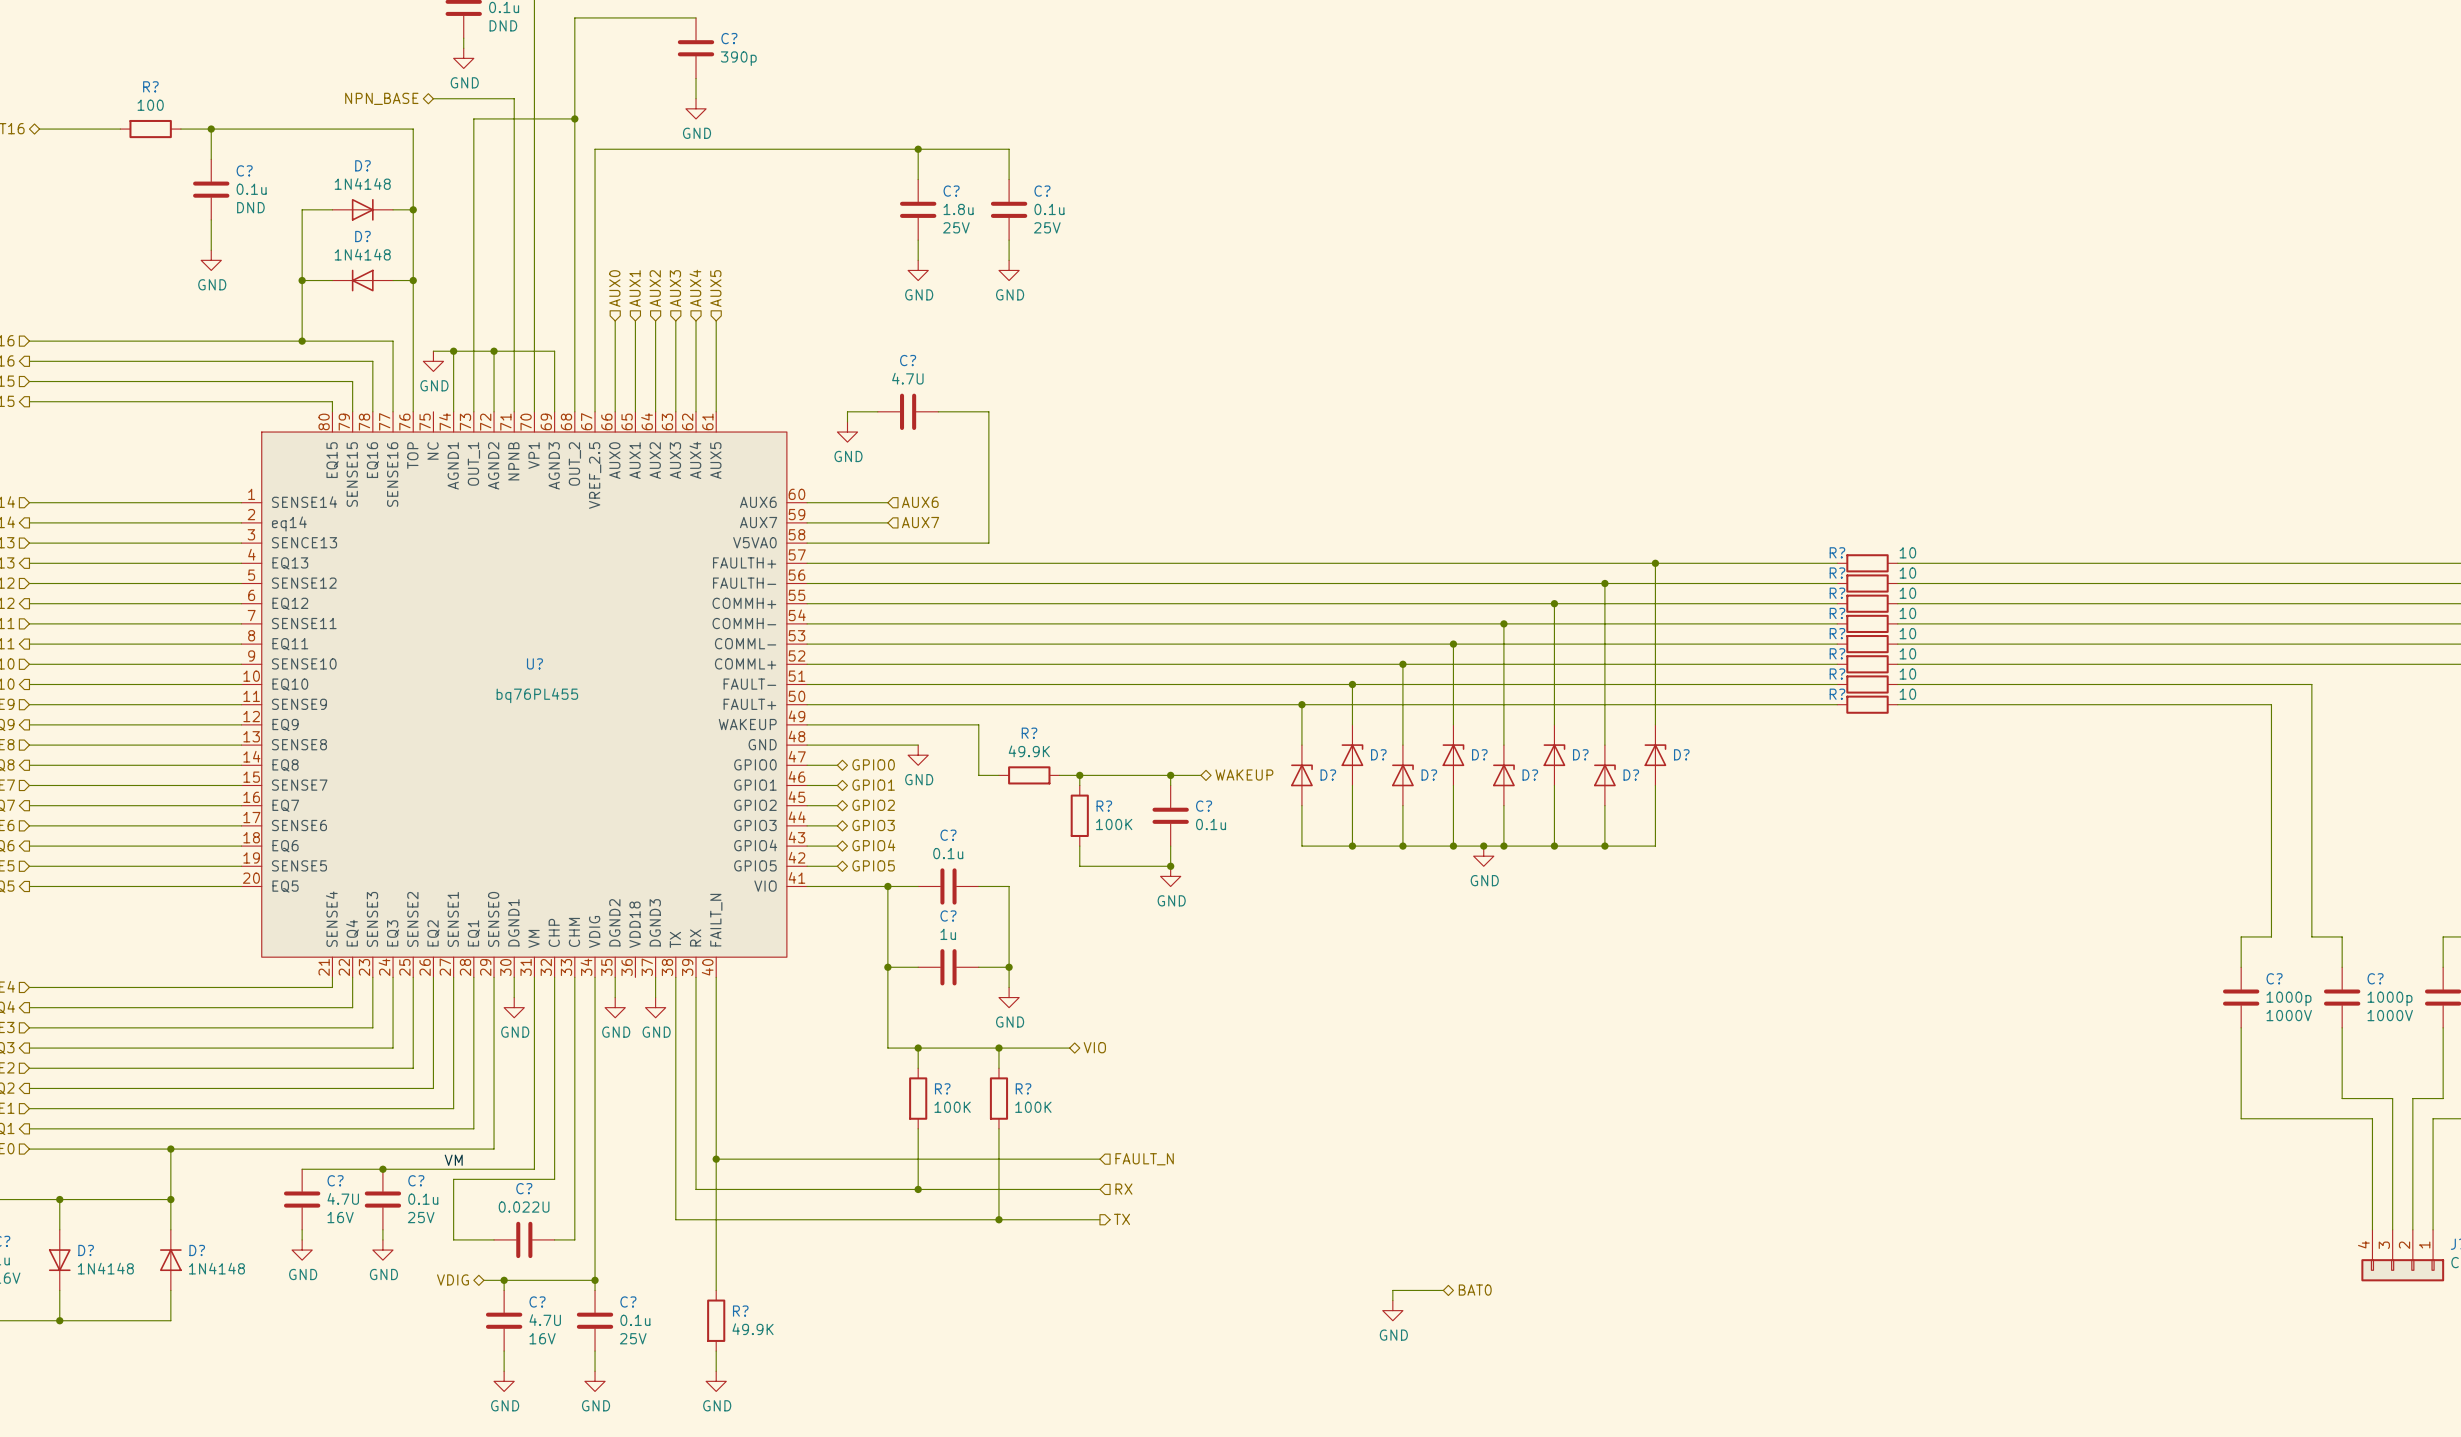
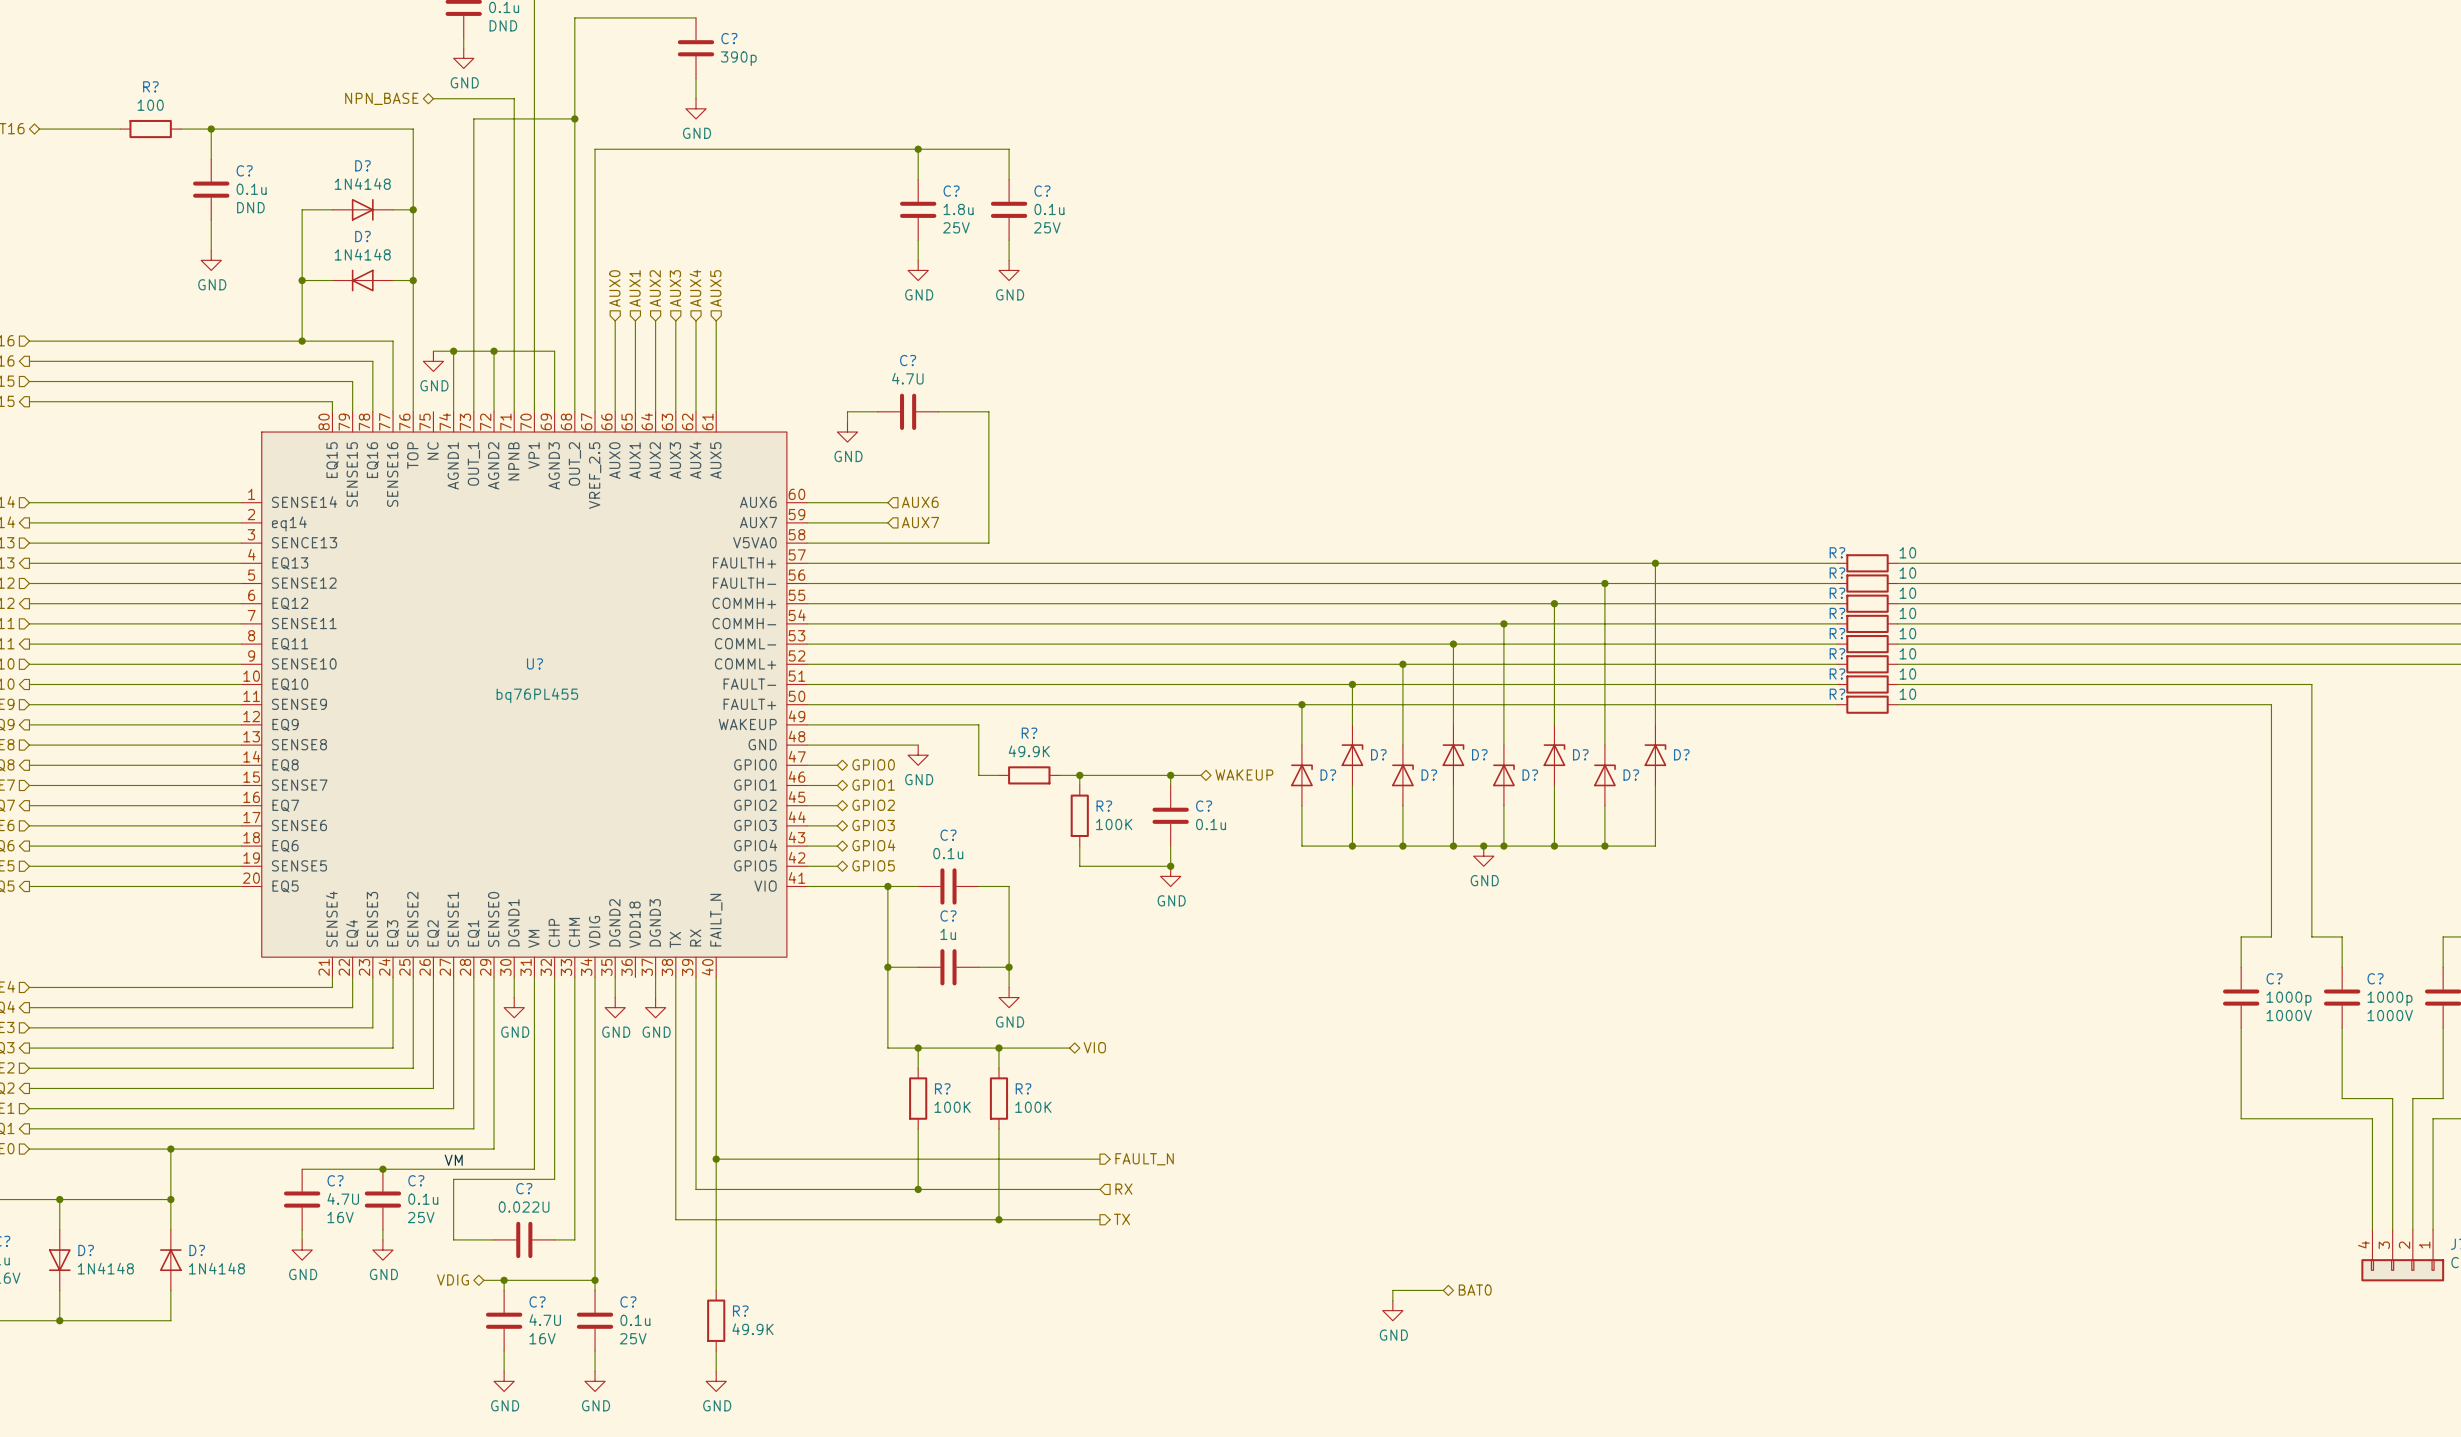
hierarchical label shape: input (1144, 1159) -> output (1144, 1159)

